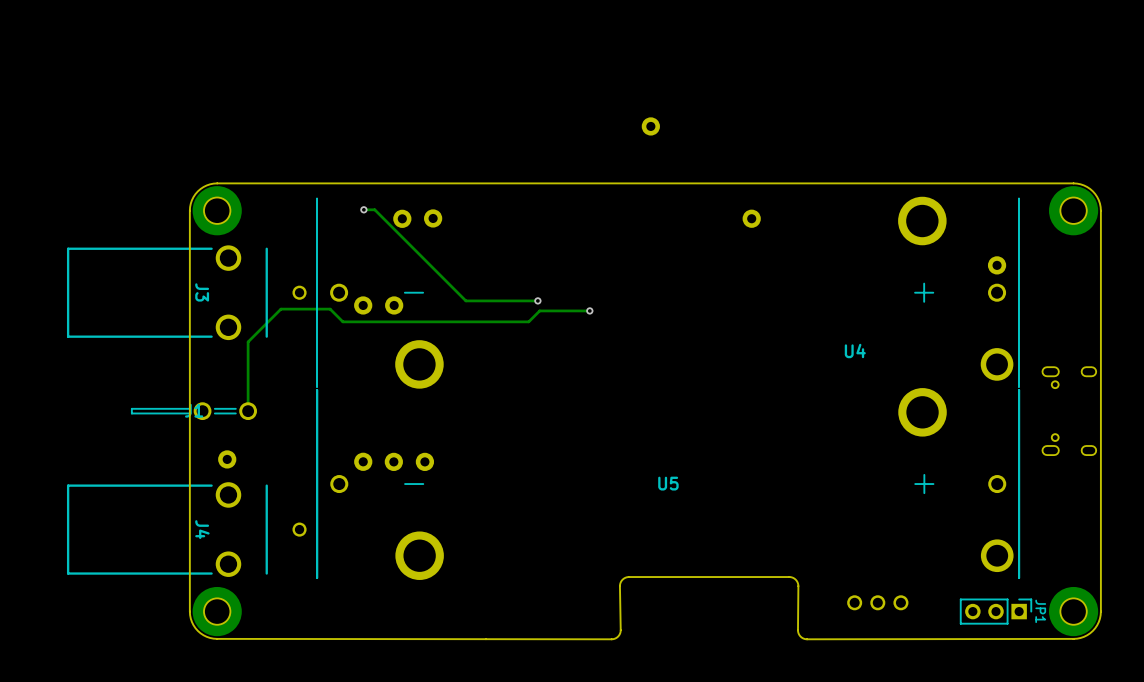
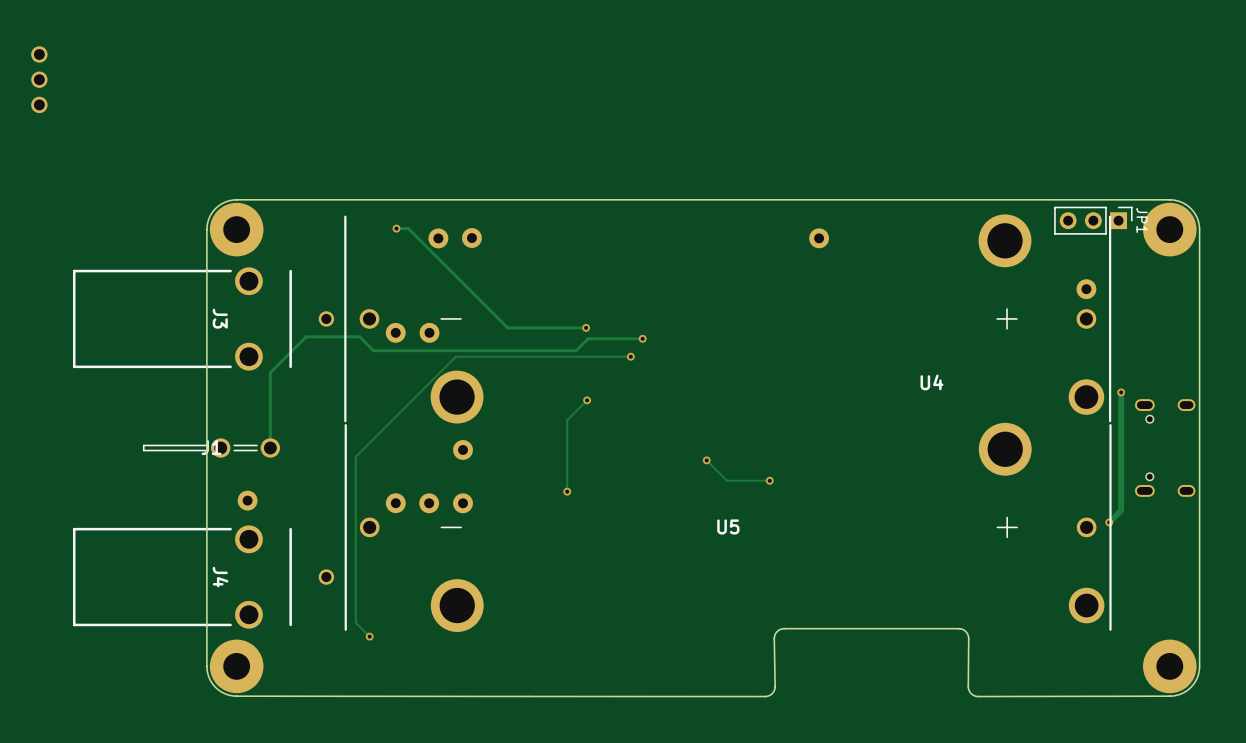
part: none -> (39, 79)
part: (650, 126) -> none
track: none -> (630, 356) (455, 356) (355, 456) (355, 622) (369, 636)
via: none -> (630, 356)
track: none -> (1121, 392) (1121, 510) (1109, 522)
via: none -> (1121, 392)
track: none -> (587, 400) (567, 420) (567, 491)
via: none -> (587, 400)
part: none -> (463, 449)
track: none -> (706, 460) (727, 480) (769, 480)
via: none -> (706, 460)
via: none -> (769, 480)
via: none -> (567, 491)
via: none -> (1109, 522)
via: none -> (369, 636)
part: (877, 602) -> none
JP1 position: (996, 611) -> (1093, 220)
board edge: (1073, 638) (806, 639) (800, 636) (798, 632) (798, 585) (792, 577) (629, 577) (623, 579) (620, 584) (620, 631) (615, 638) (485, 639) -> (1169, 696) (976, 696) (971, 693) (968, 688) (968, 637) (966, 632) (962, 629) (784, 628) (778, 630) (774, 636) (775, 687) (772, 693) (767, 696) (529, 696)

